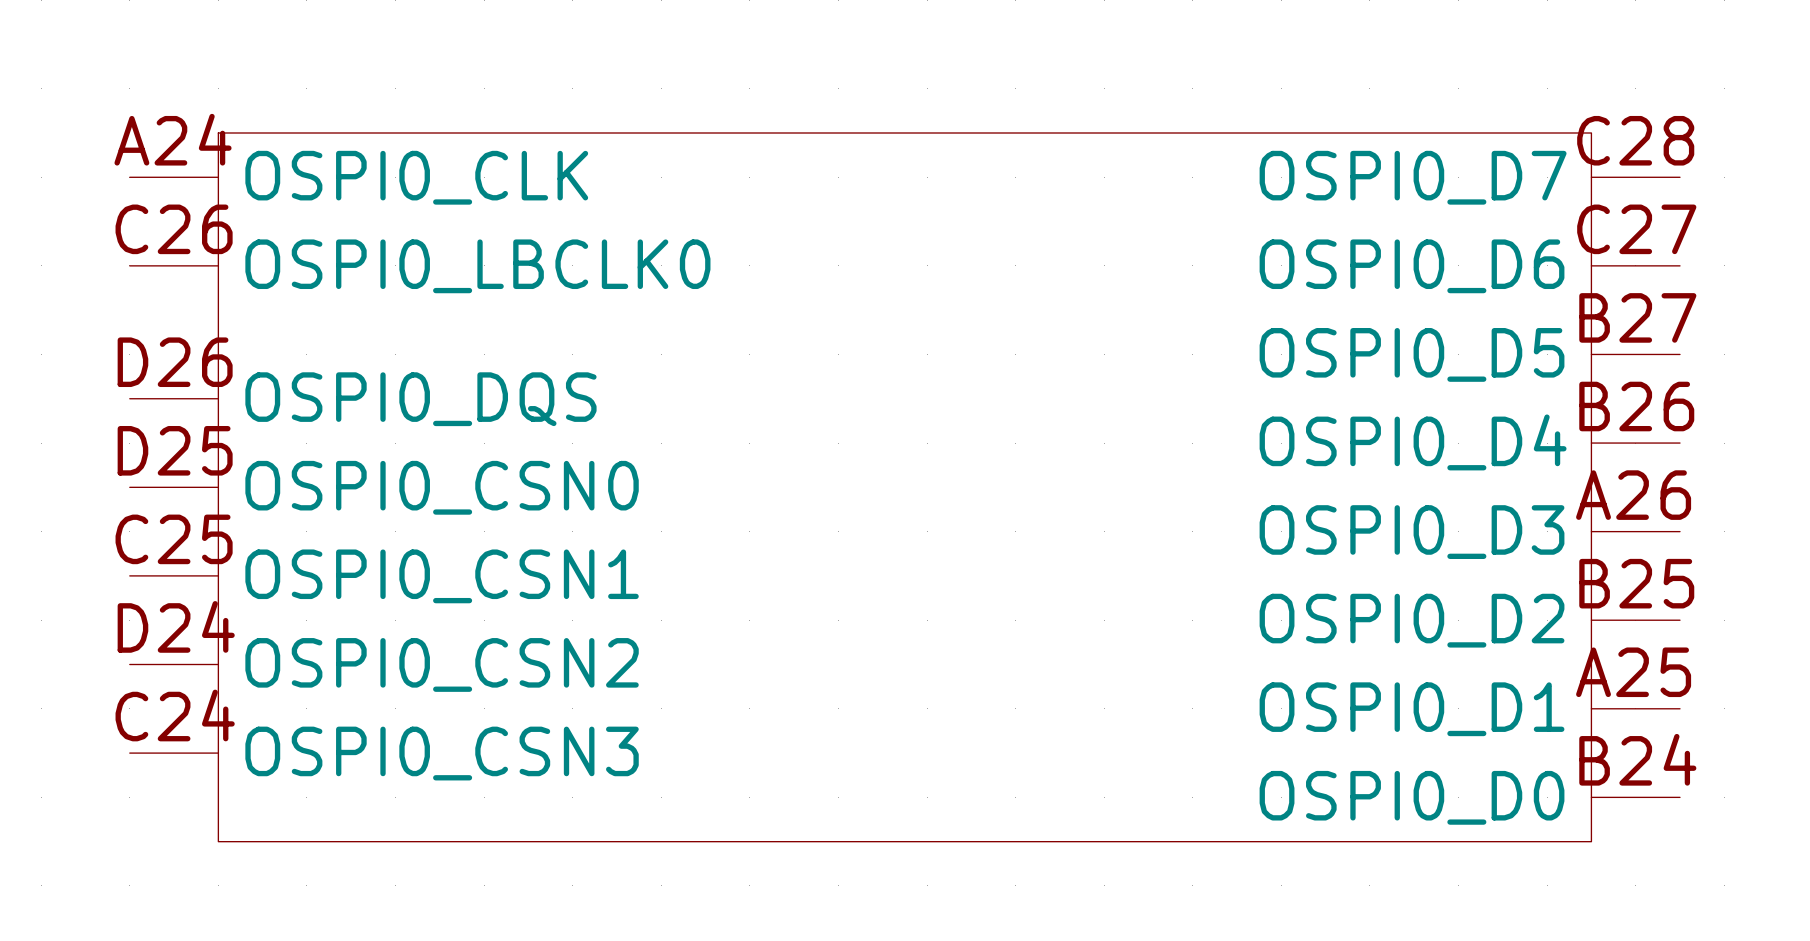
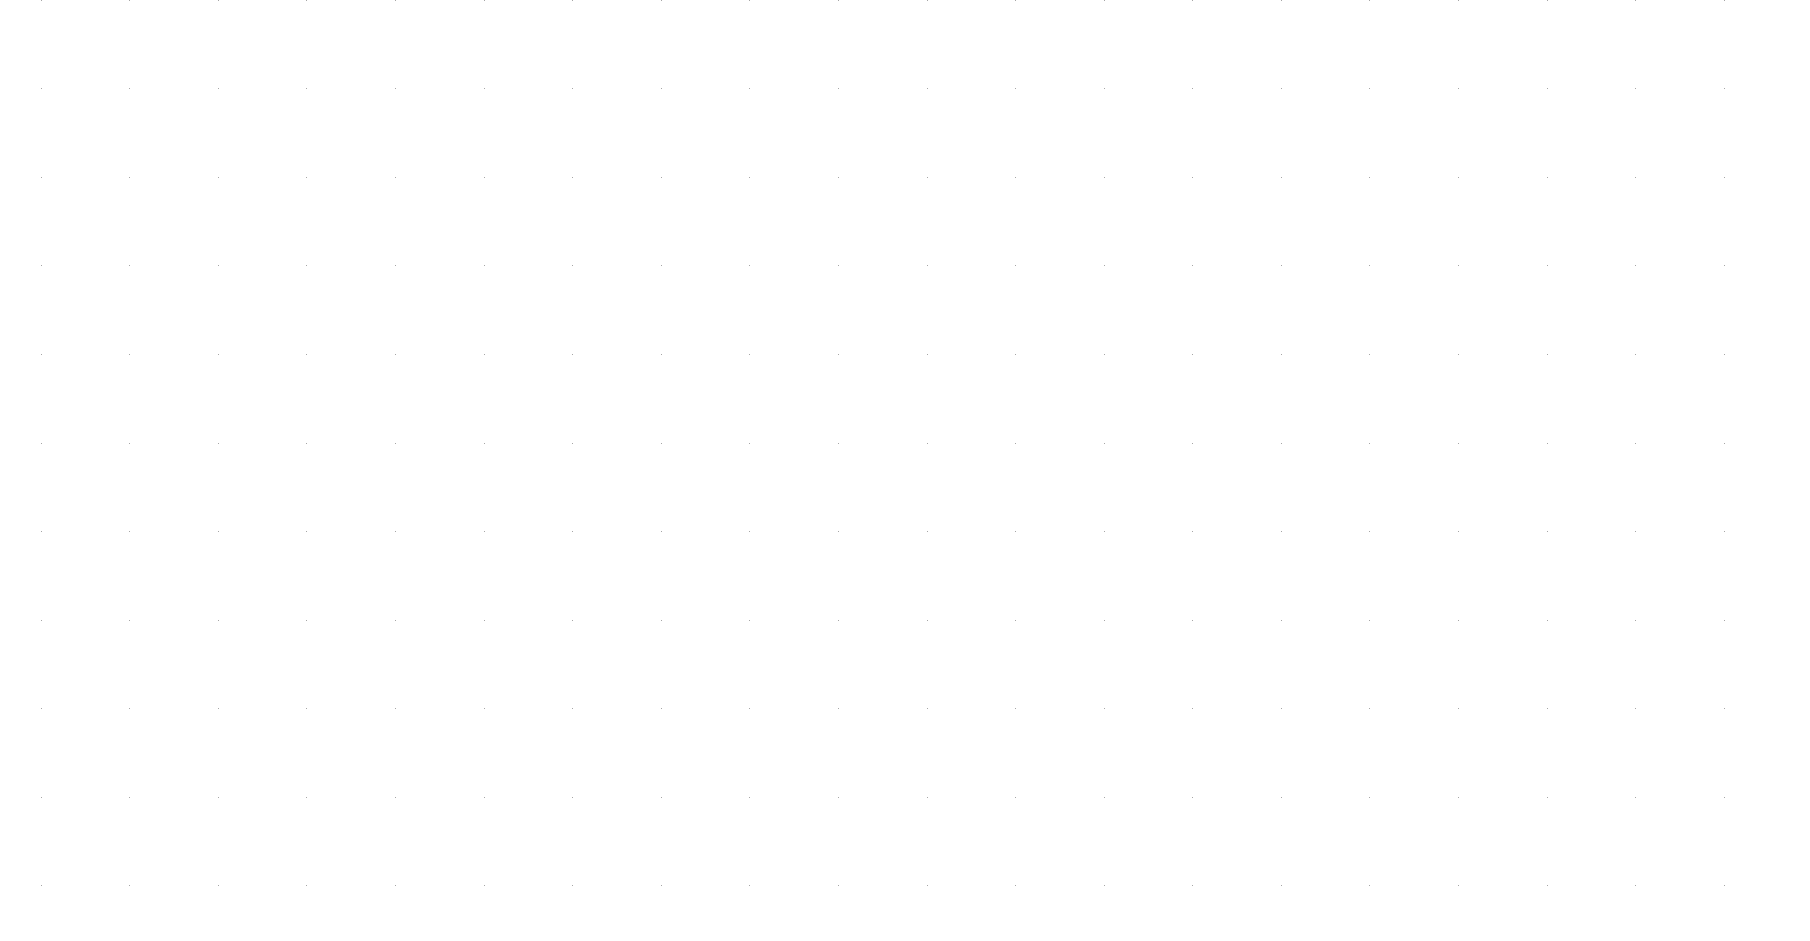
part: (904, 487) -> none

